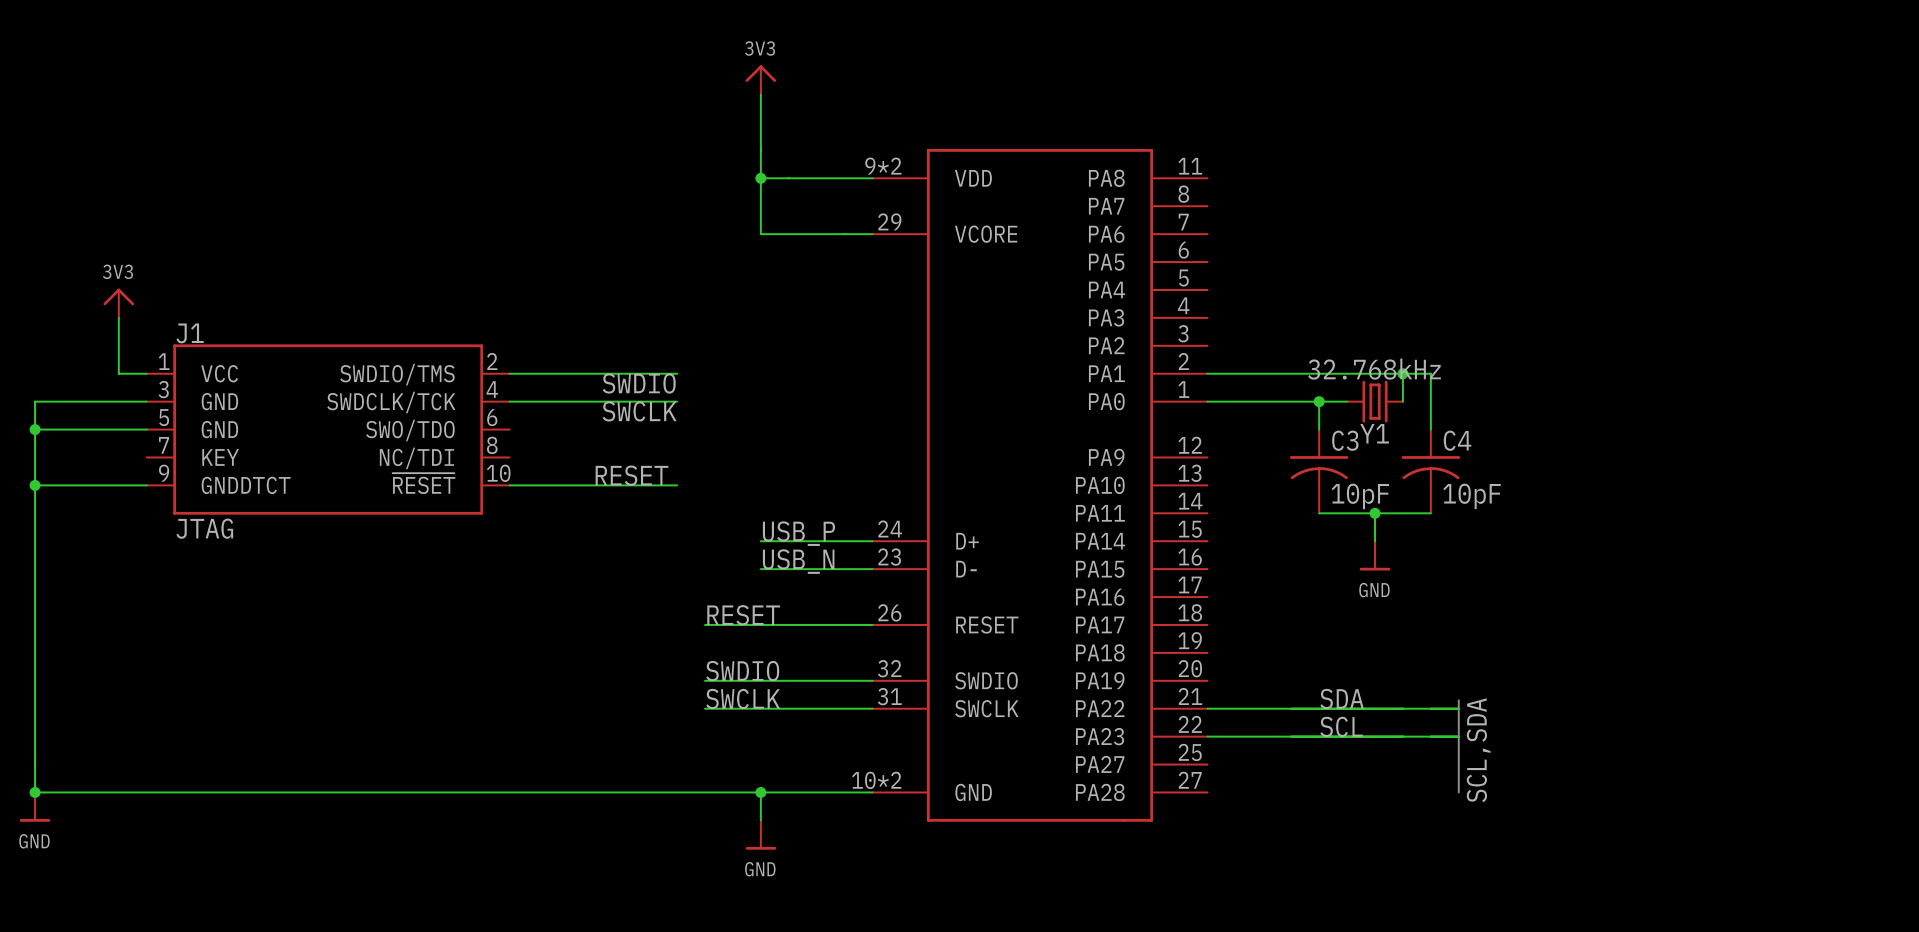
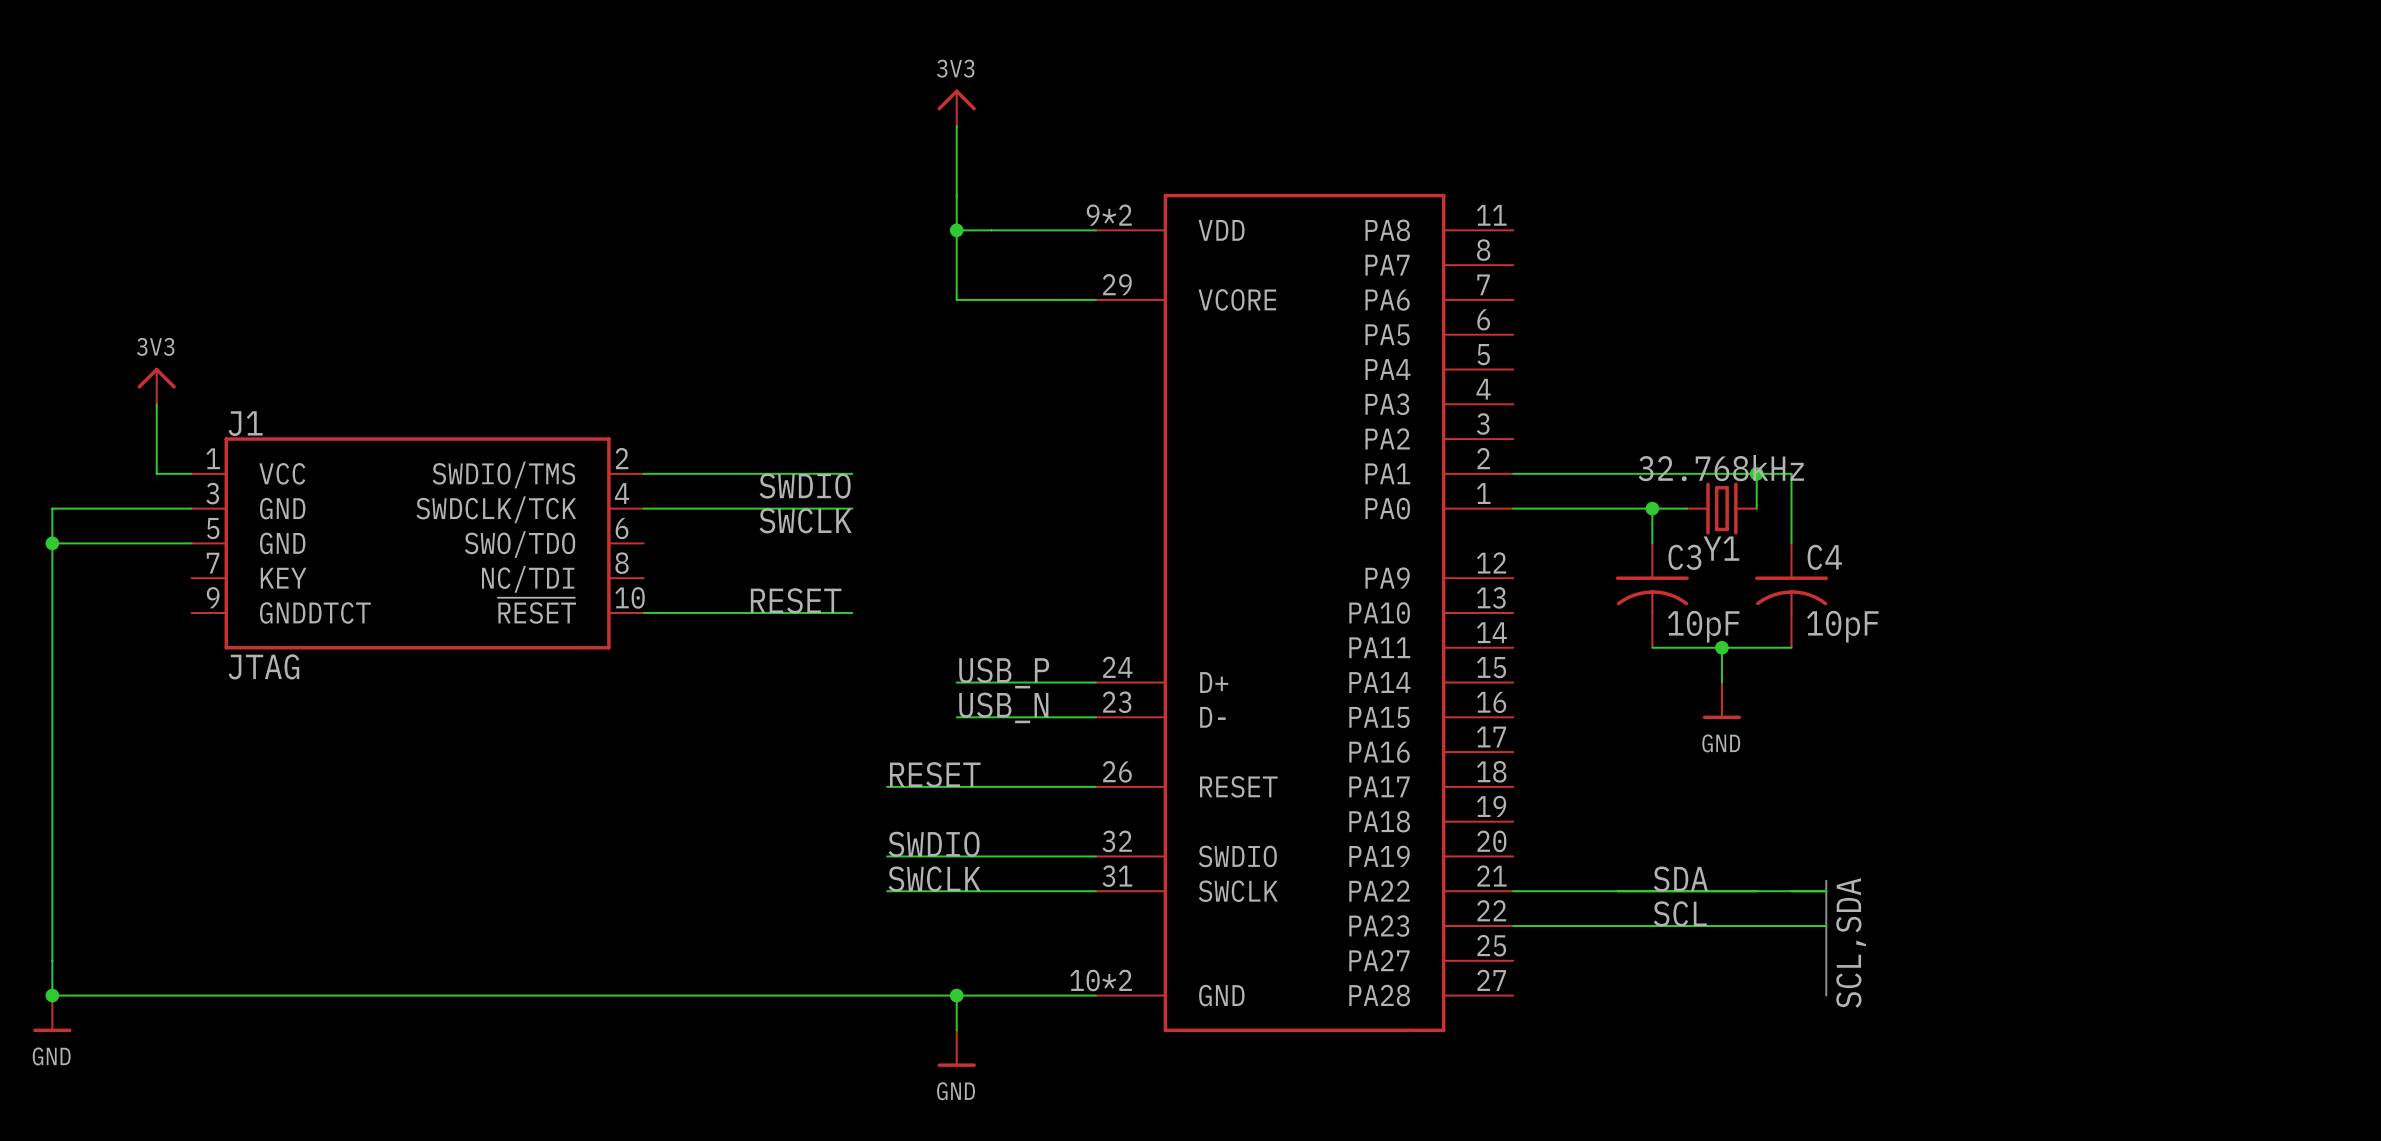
wire: (35, 485) (146, 485) -> none
junction: (35, 485) -> none

